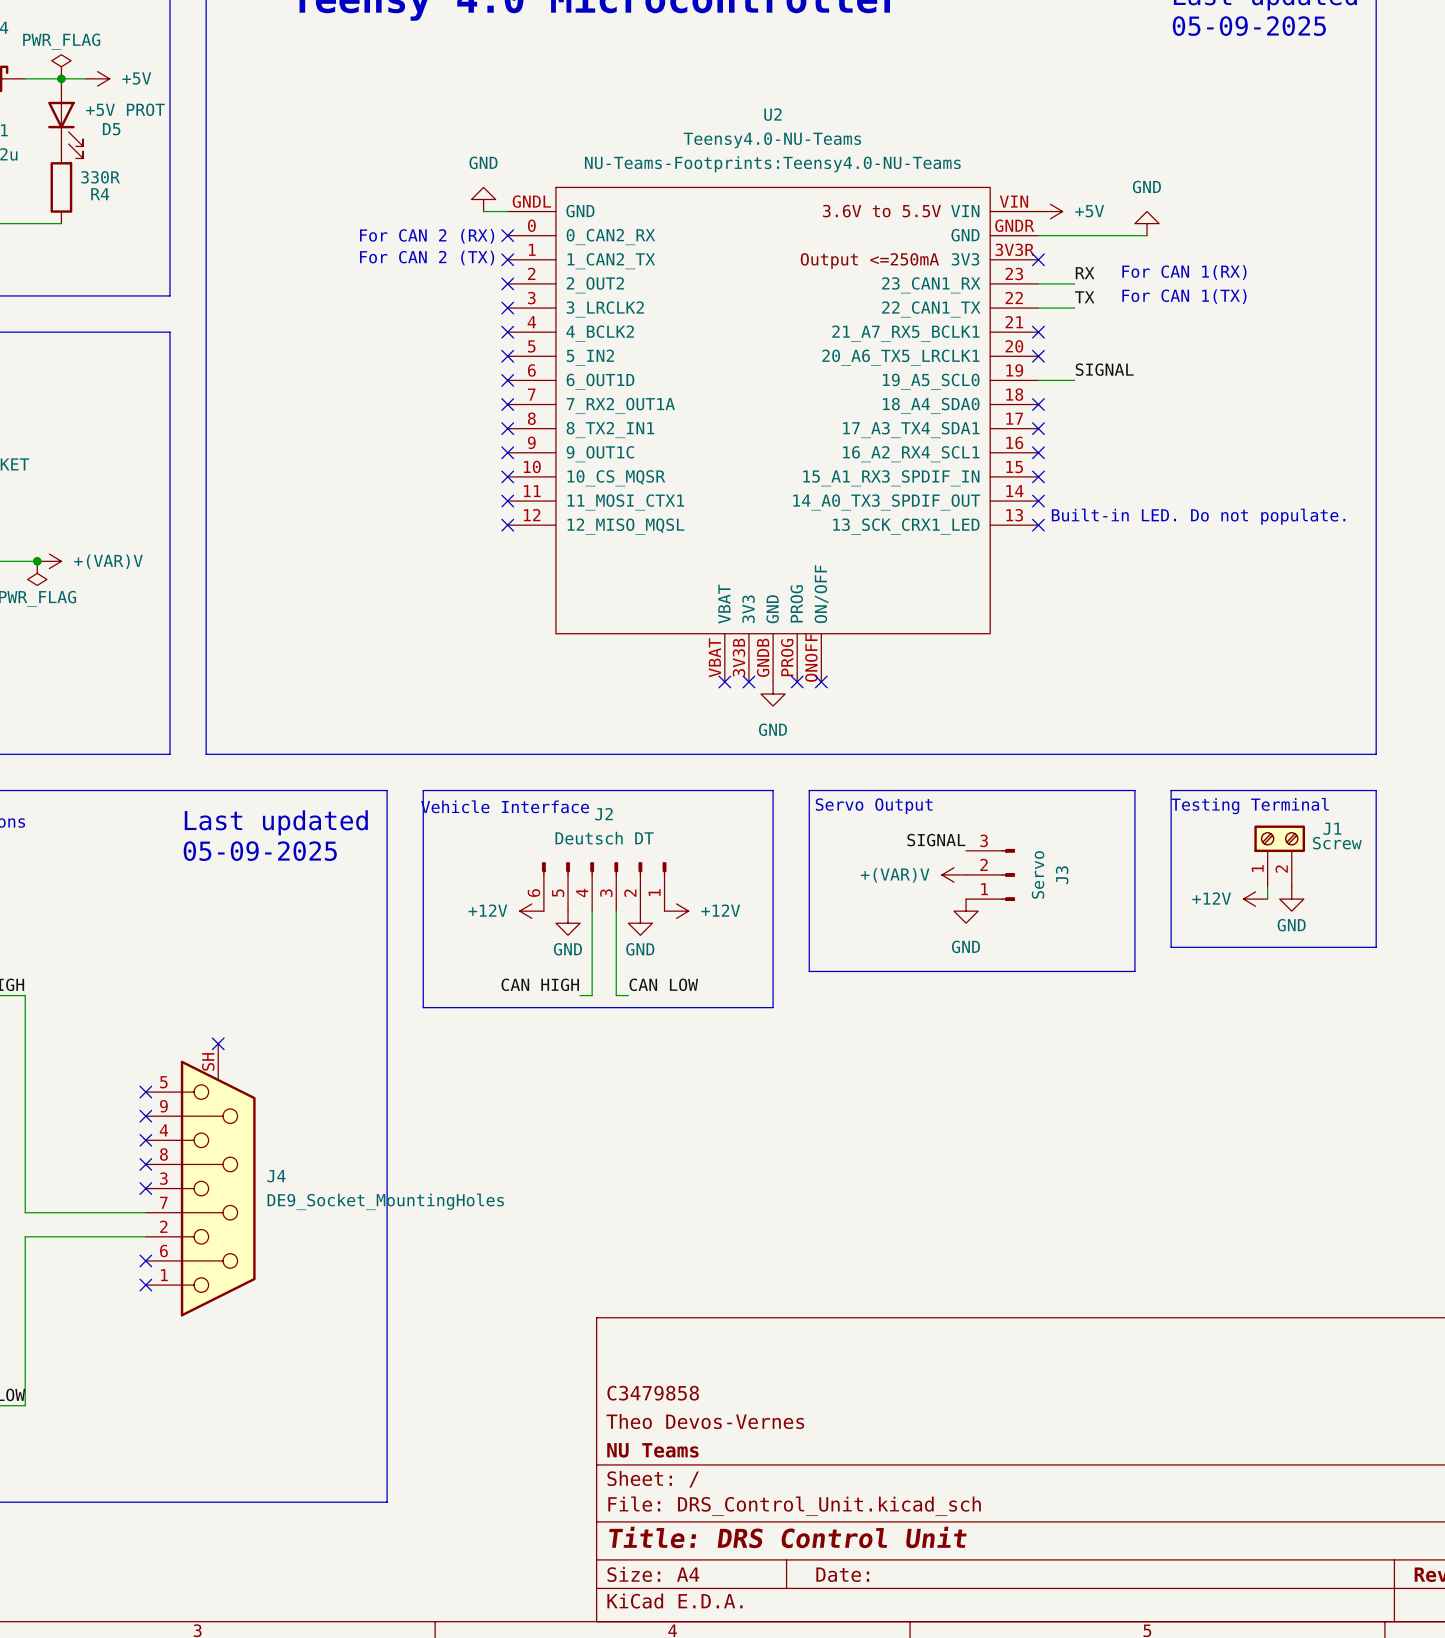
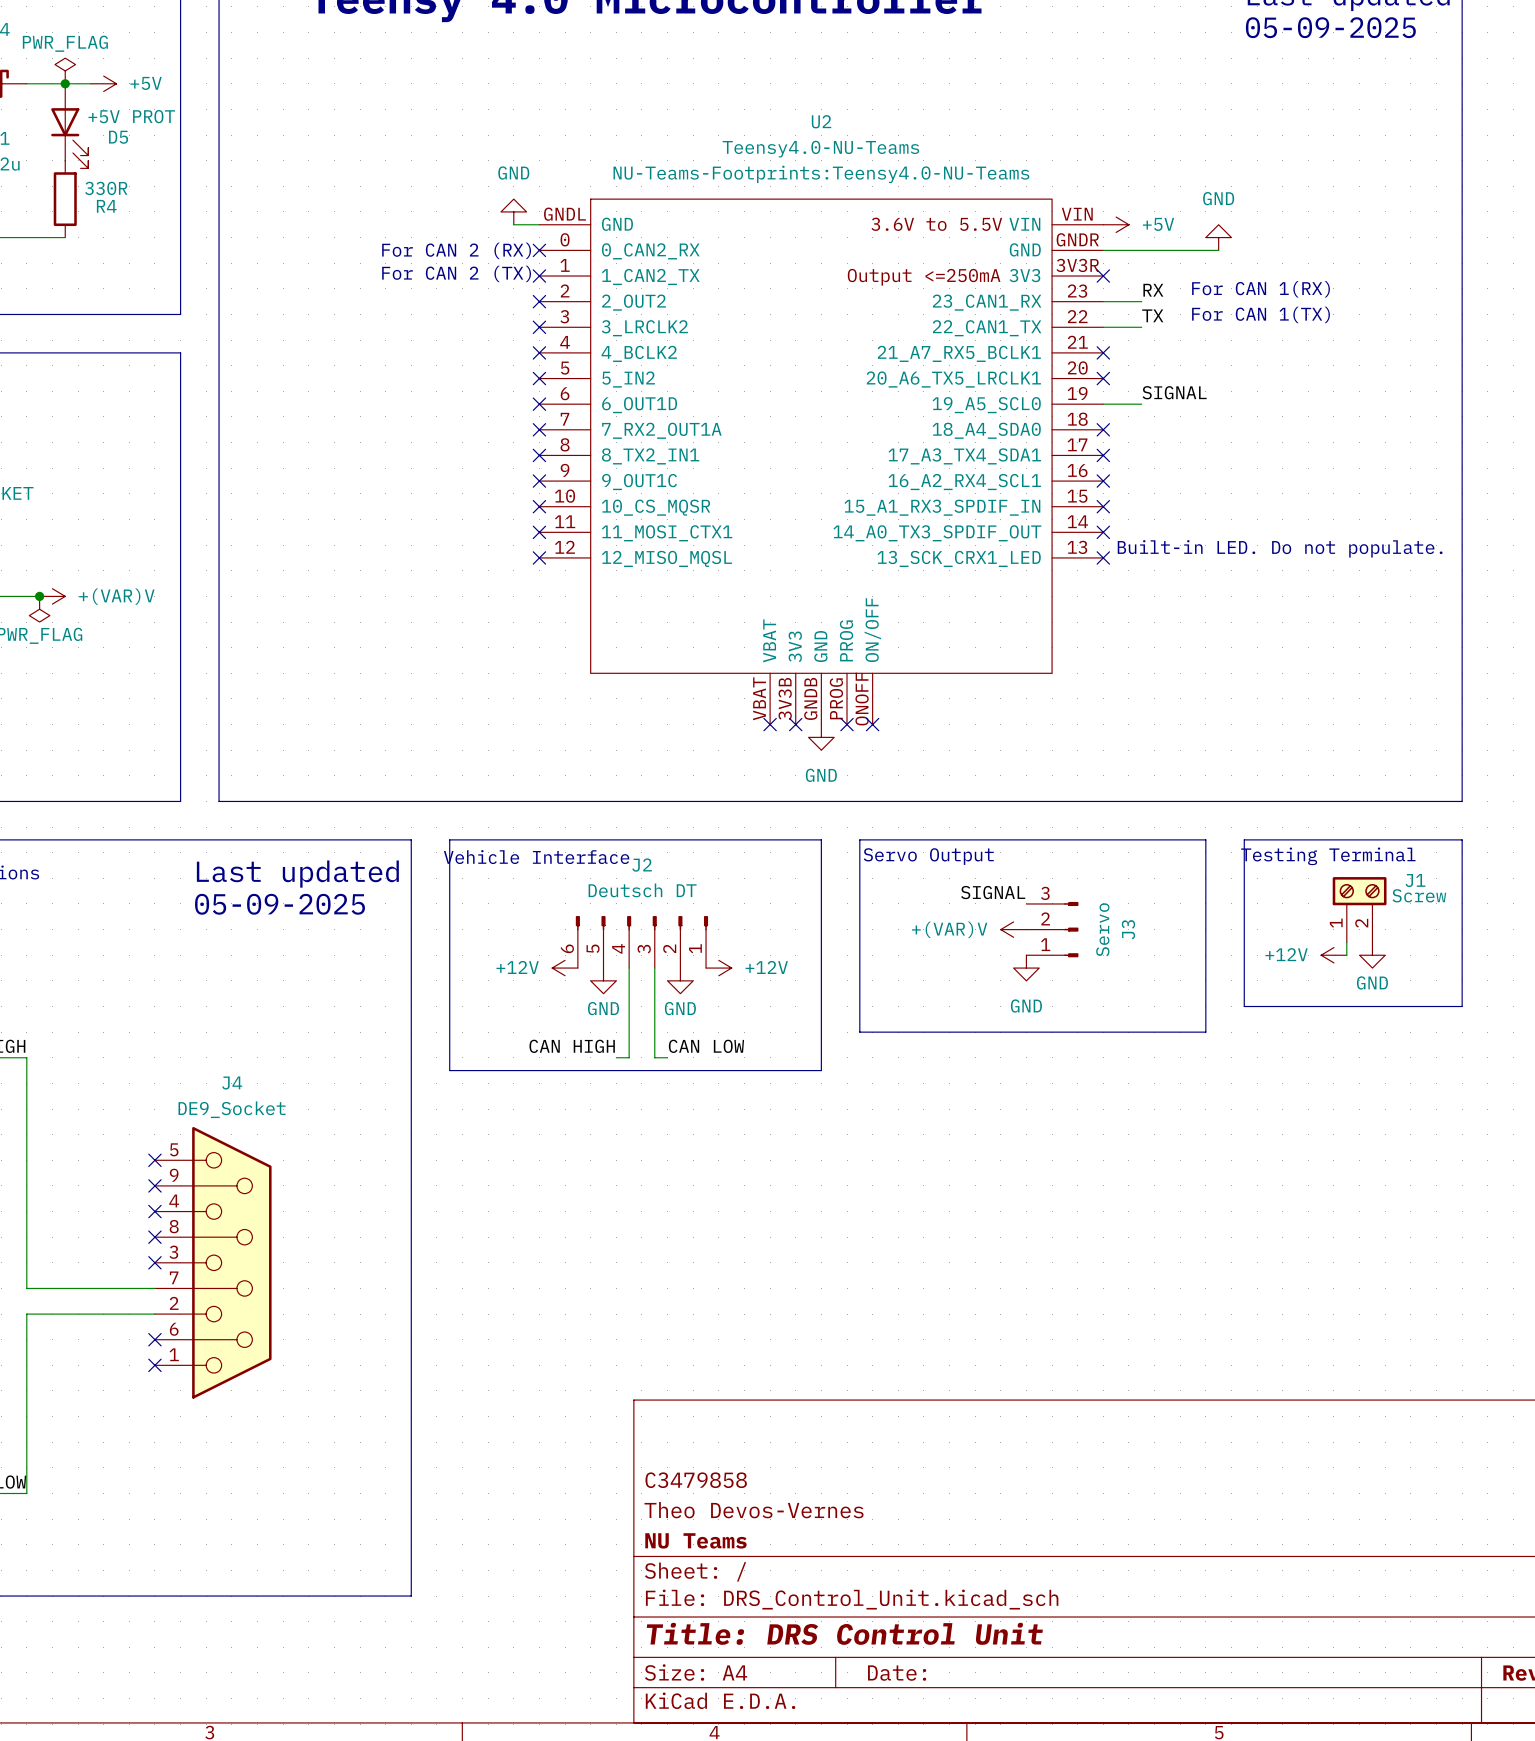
J4 symbol: [145, 1043, 256, 1317] -> [154, 1126, 272, 1399]
no-connect mark: (218, 1043) -> none
J4 name position: J4 (276, 1176) -> J4 (232, 1083)
J4 value: DE9_Socket_MountingHoles (385, 1201) -> DE9_Socket (232, 1109)

